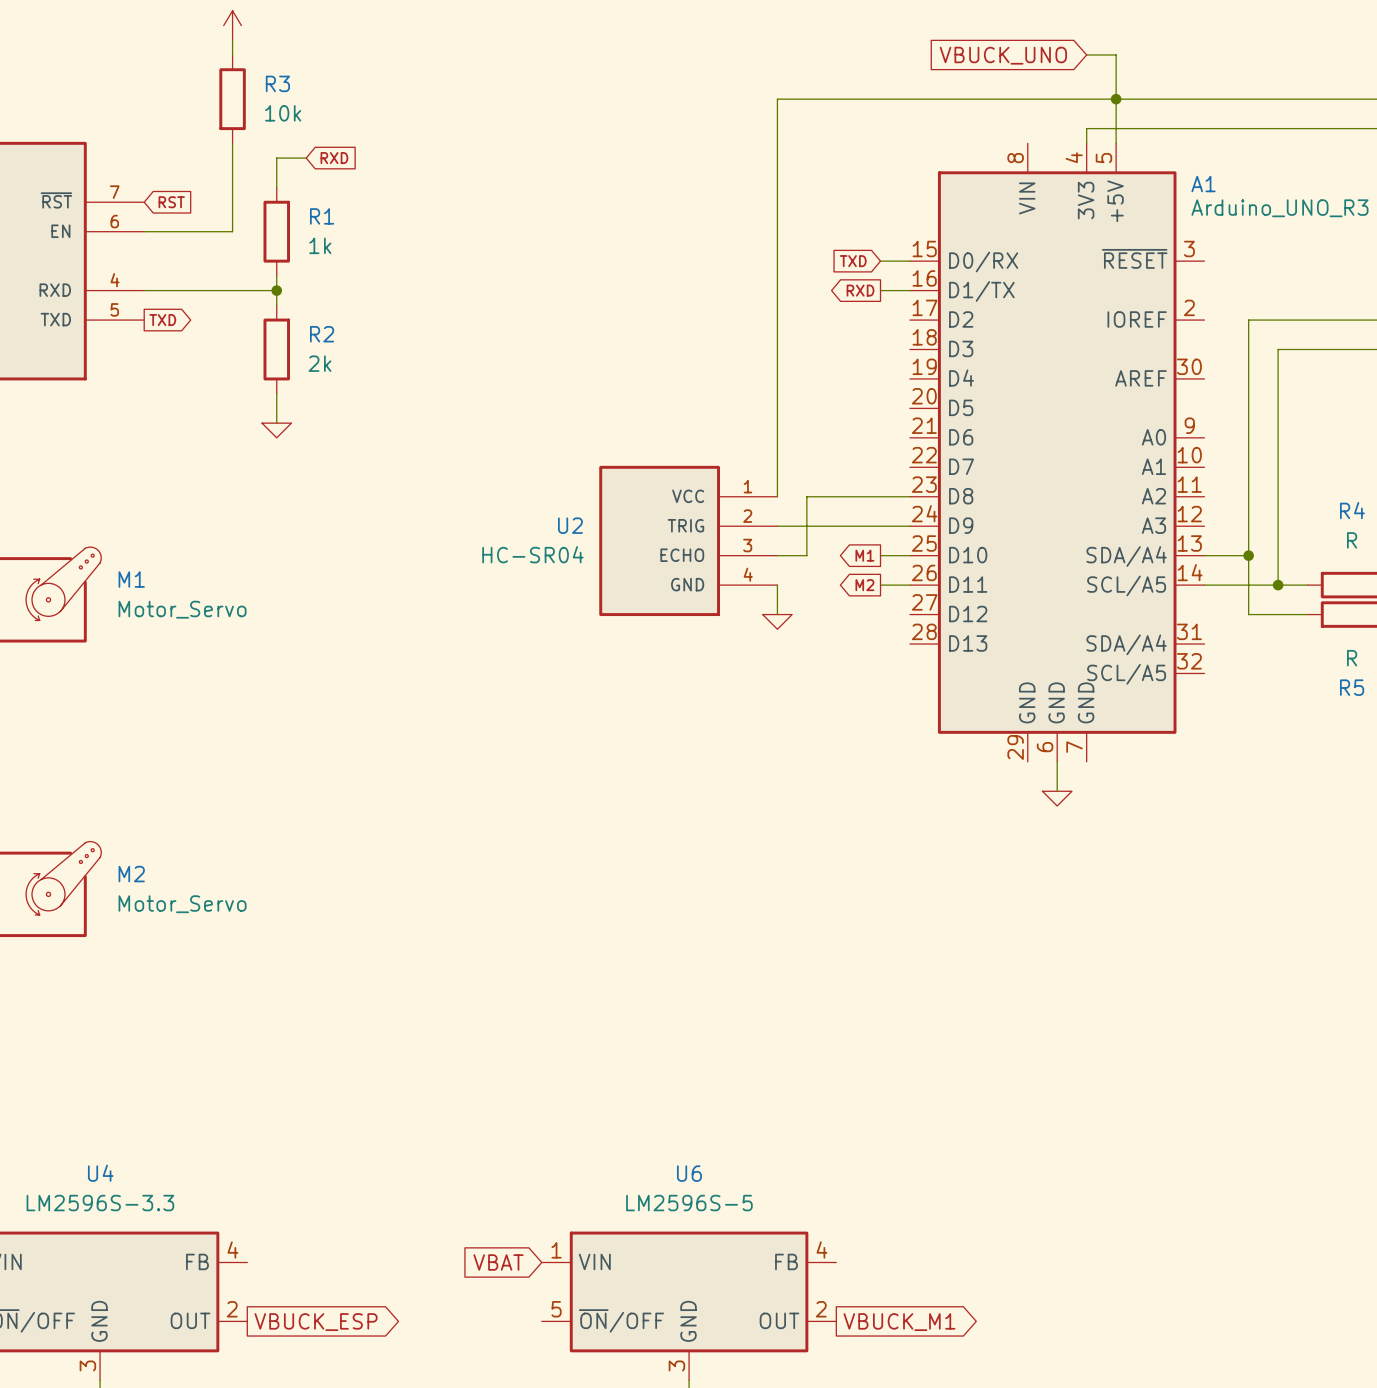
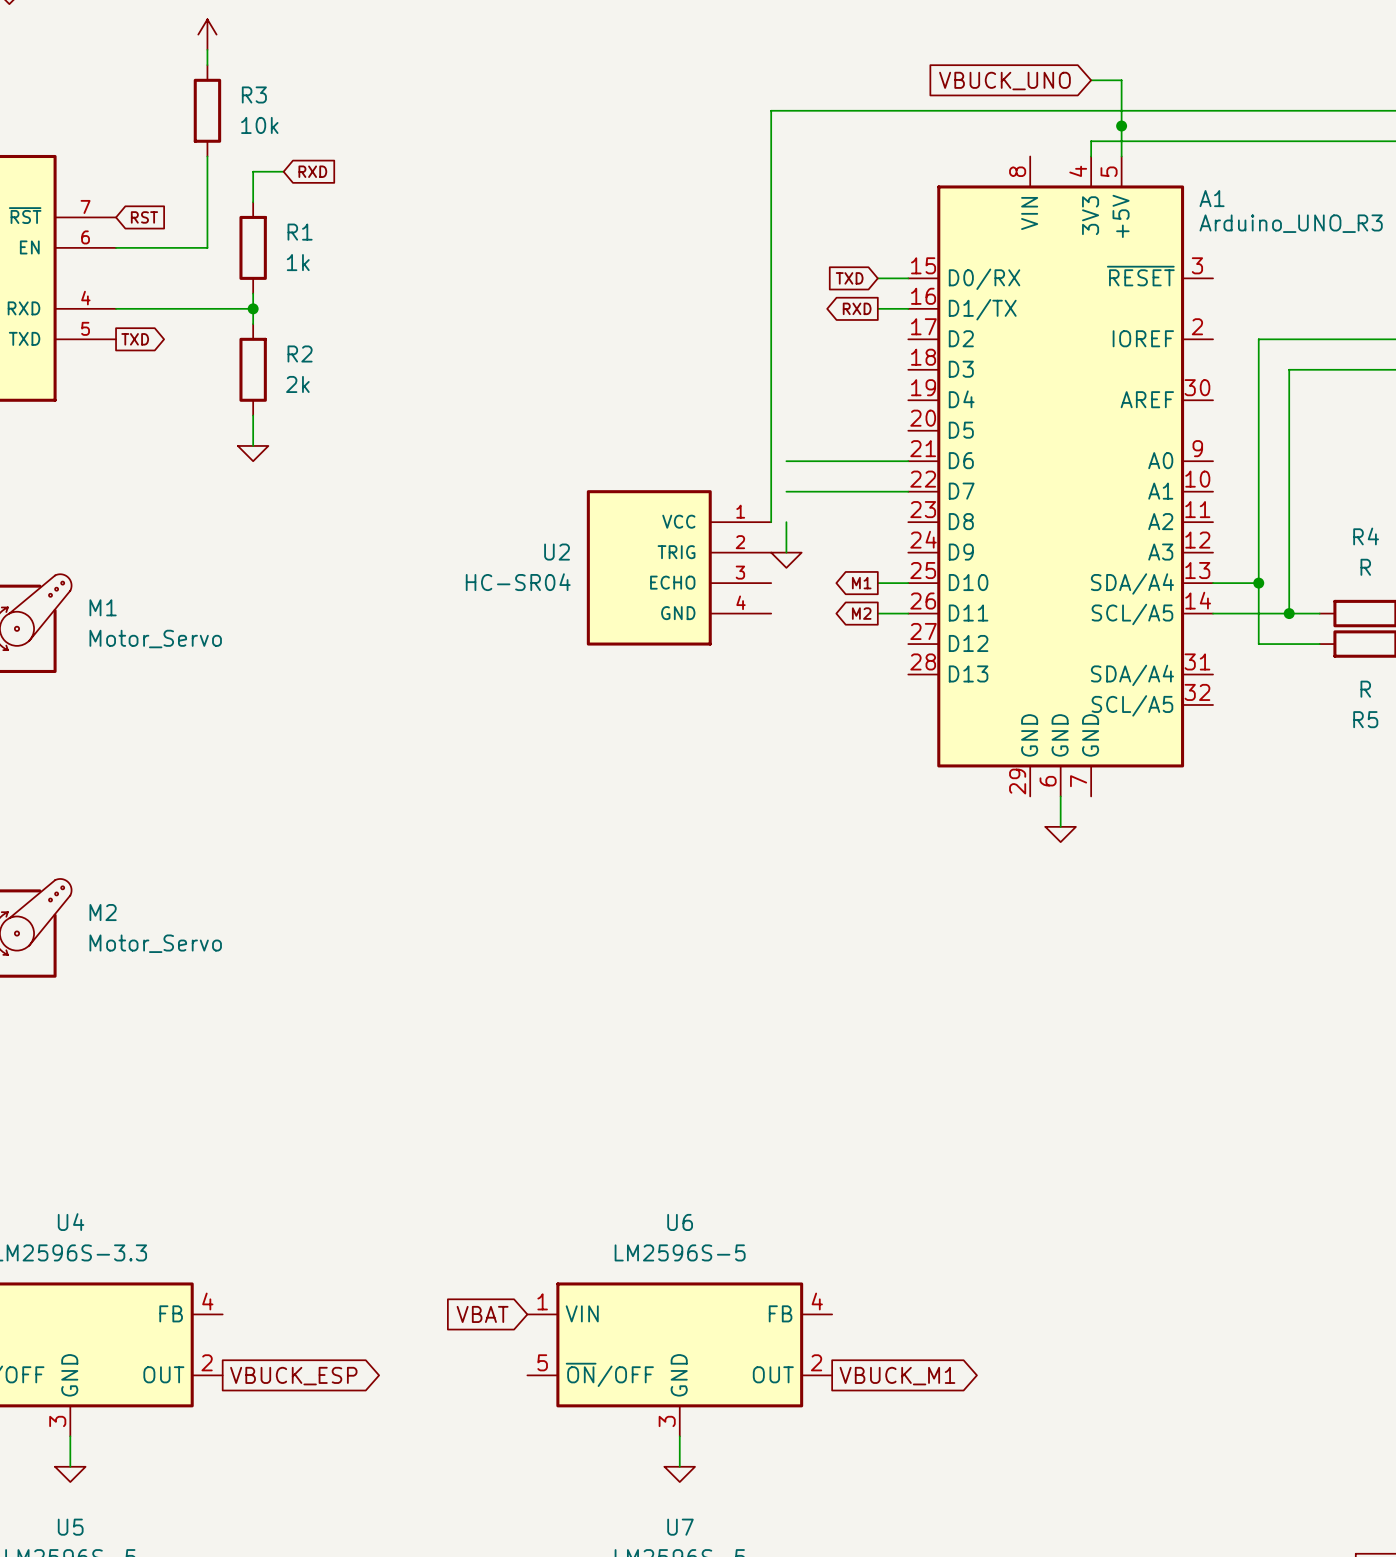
wire: (1086, 54) (1116, 54) (1116, 69) -> (1091, 80) (1121, 80)
global label position: VBUCK_UNO (1003, 55) -> VBUCK_UNO (1004, 81)
junction position: (1116, 99) -> (1121, 126)
wire: none -> (786, 461) (908, 461)
wire: none -> (786, 491) (908, 491)
wire: (909, 496) (806, 496) (806, 555) (777, 555) -> none
wire: (777, 526) (909, 526) -> none
wire: (777, 585) (777, 614) -> (786, 522) (786, 552)
power symbol position: (777, 621) -> (786, 560)

